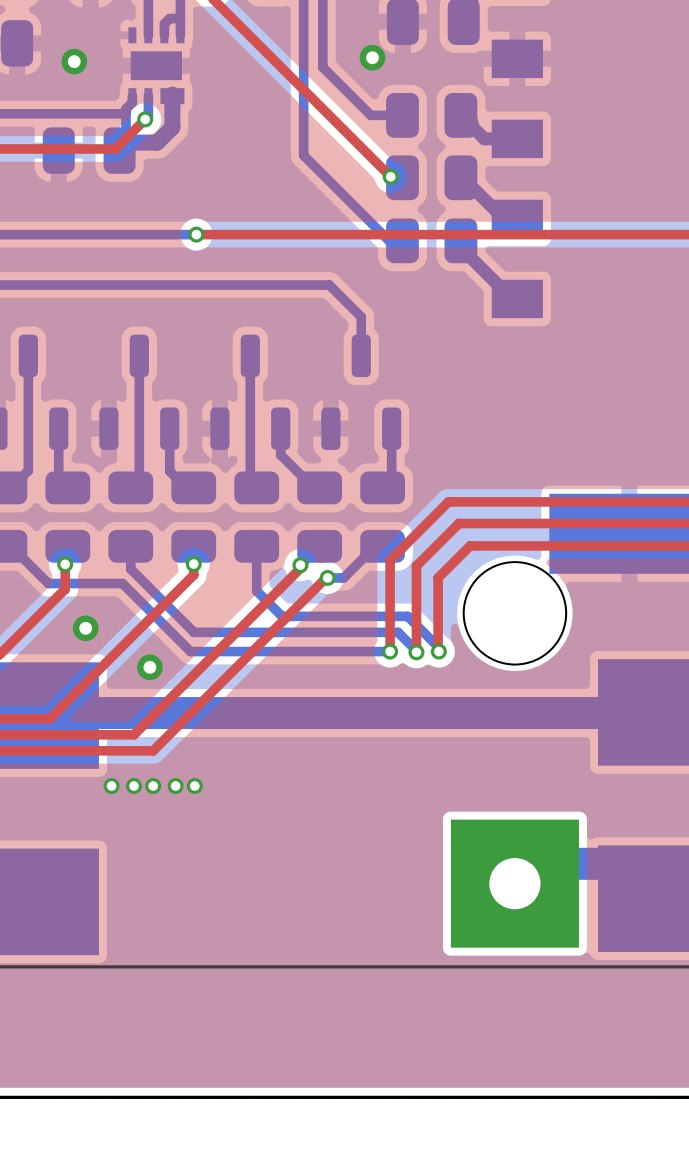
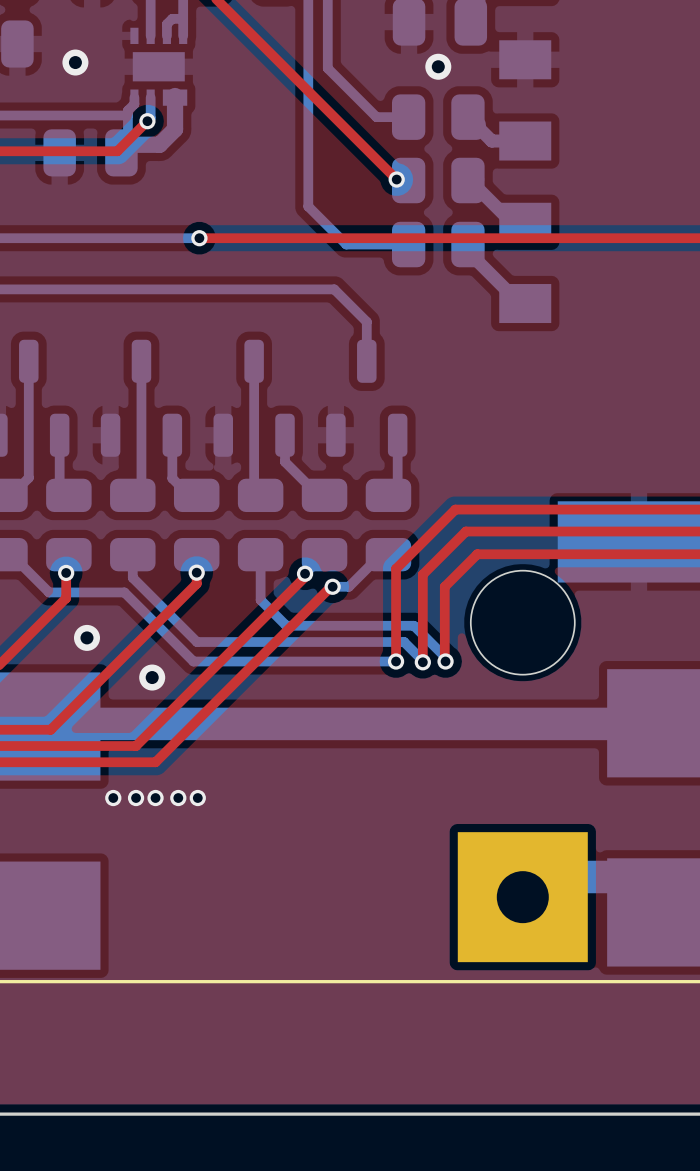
via position: (372, 57) -> (438, 66)
bottom track: (303, 155) (389, 240) -> (308, 157) (308, 206) (346, 244) (395, 244)

